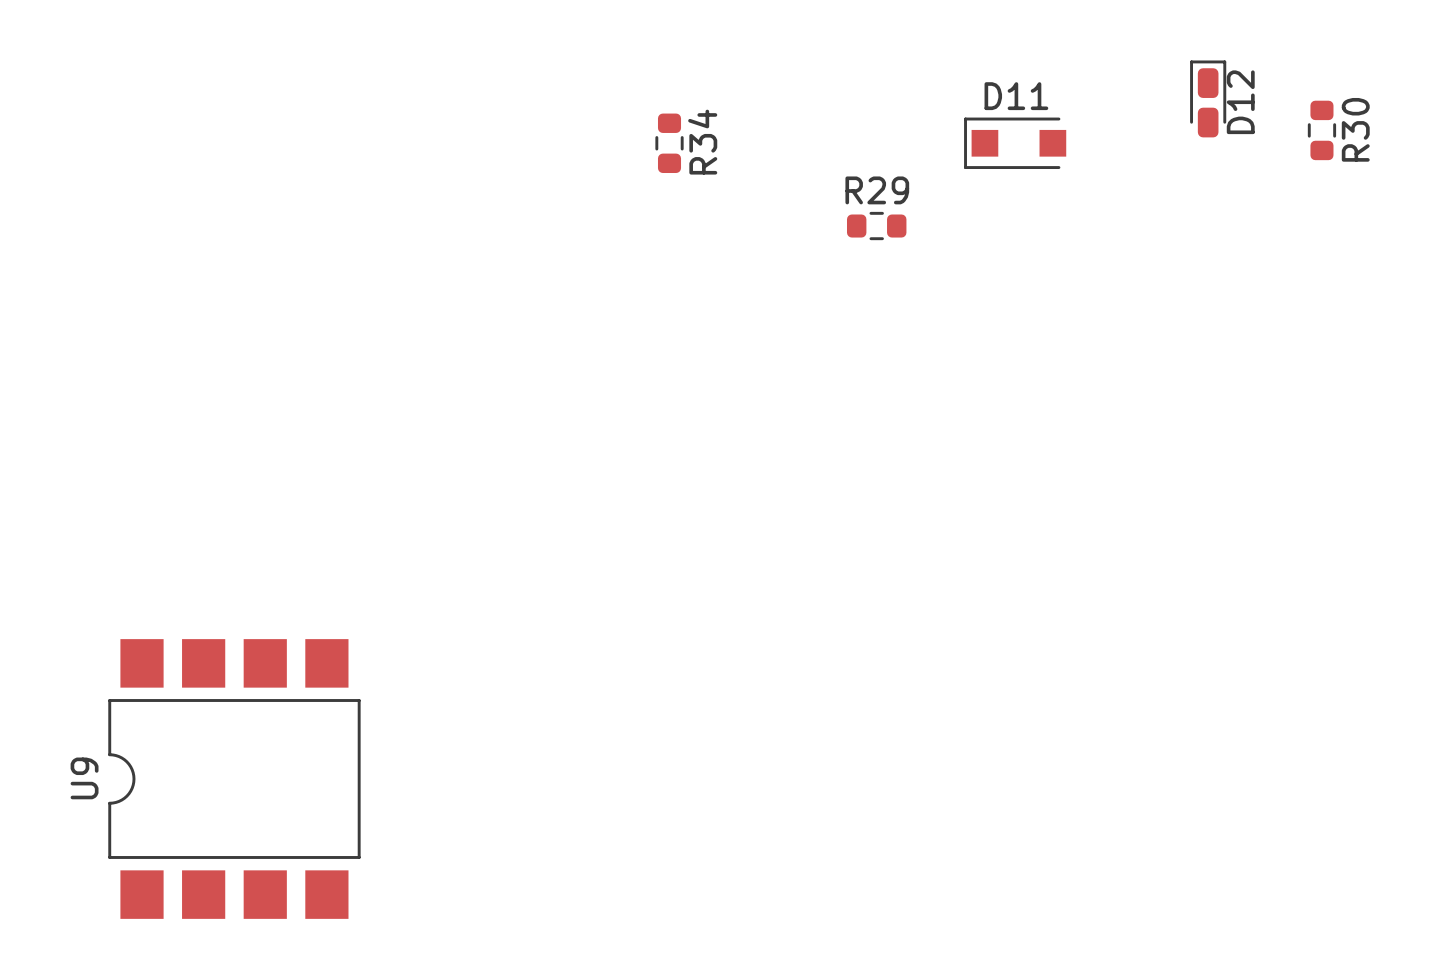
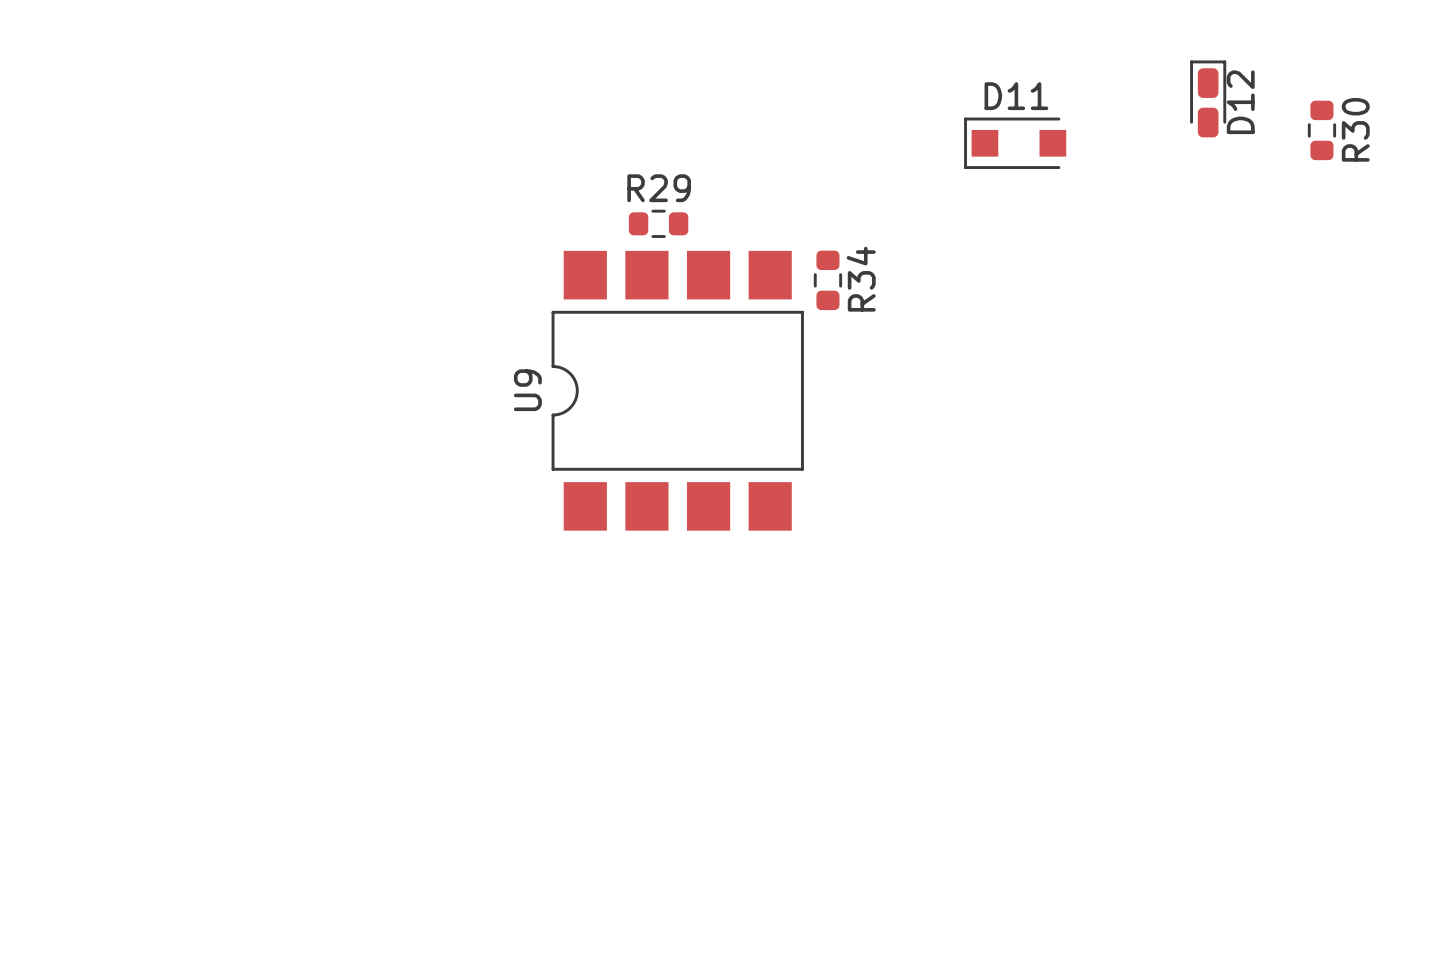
R34 position: (669, 143) -> (827, 280)
R29 position: (876, 226) -> (658, 223)
U9 position: (234, 778) -> (677, 390)

